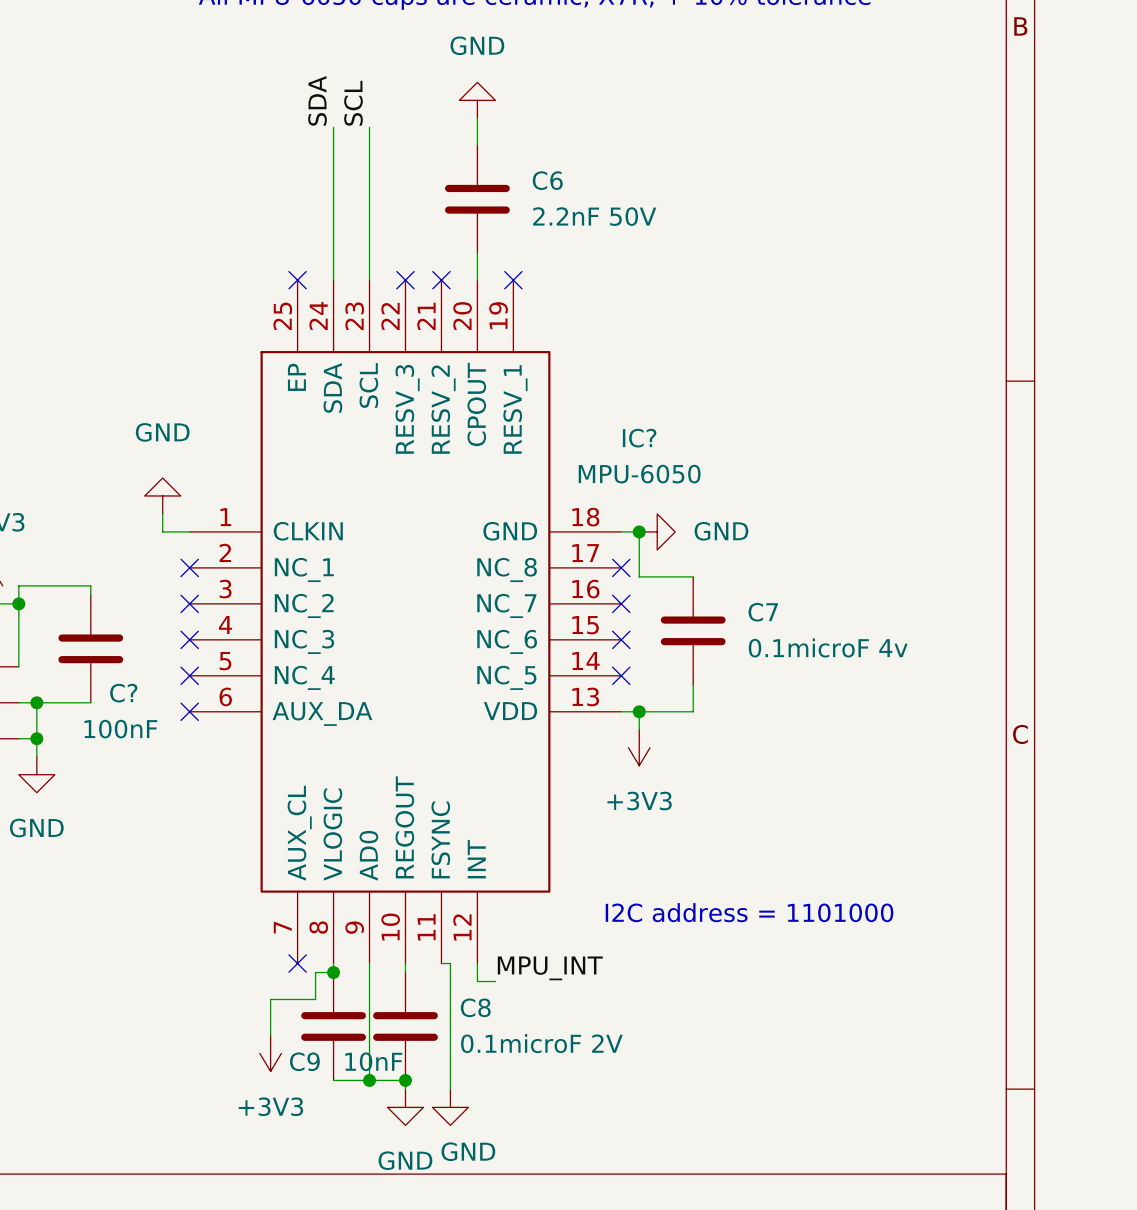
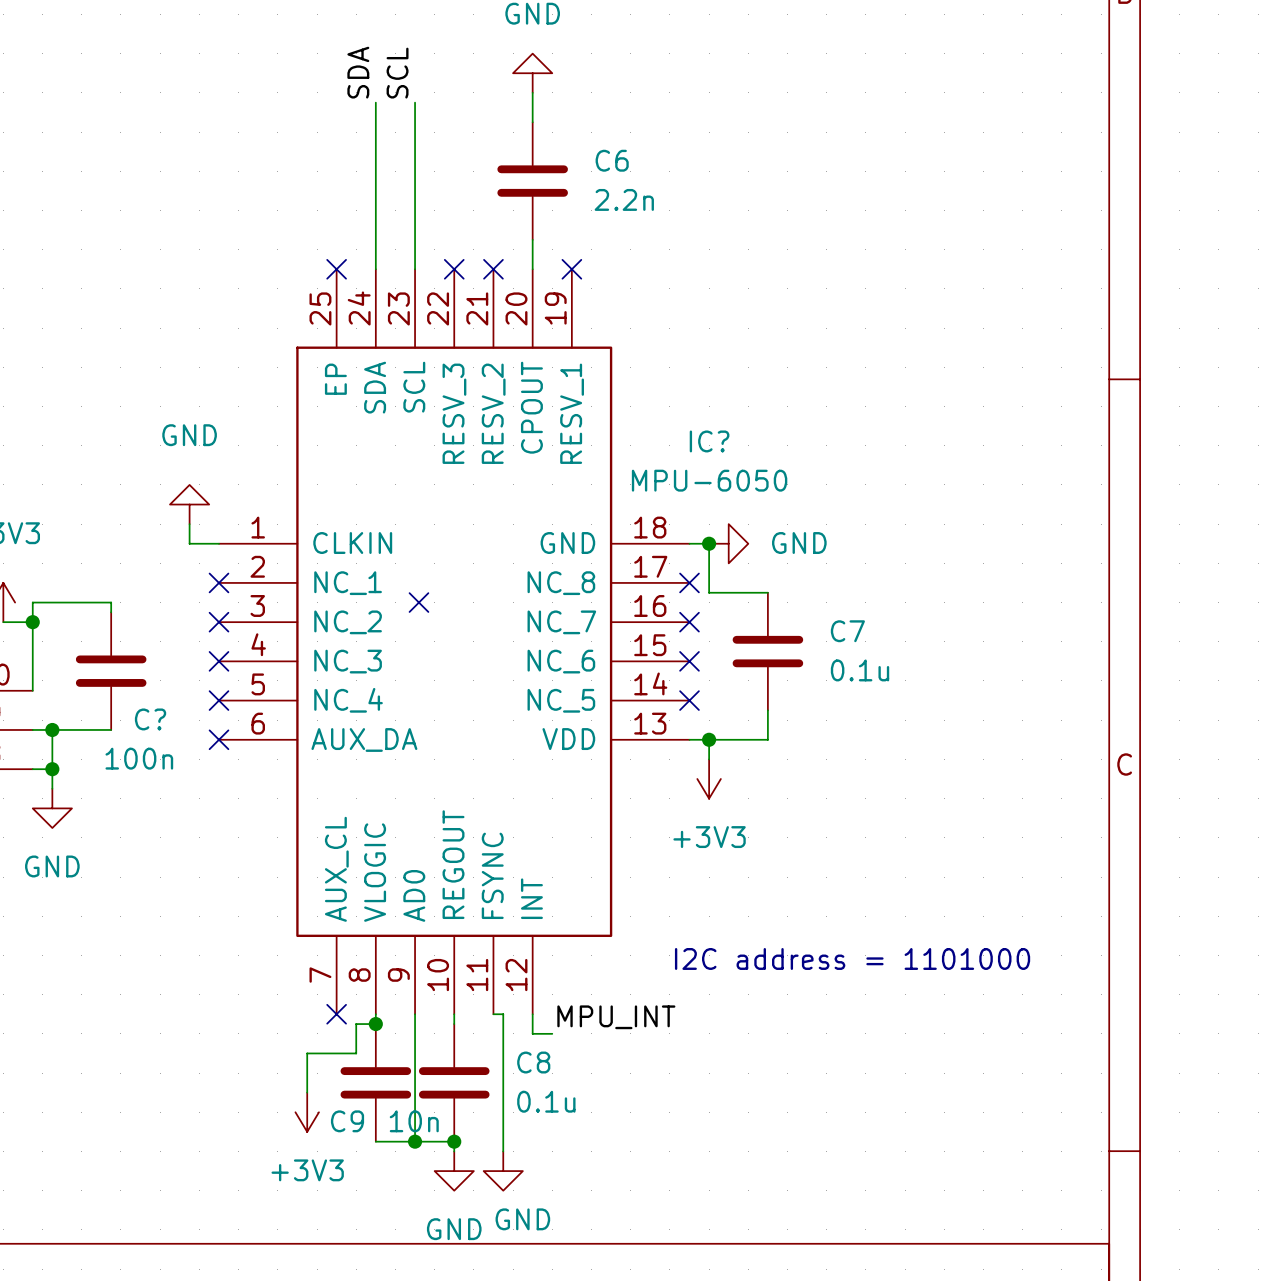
C6 value: 2.2nF 50V (594, 216) -> 2.2n (624, 199)
no-connect mark: none -> (418, 602)
C7 value: 0.1microF 4v (828, 647) -> 0.1u (860, 670)
C? value: 100nF (120, 729) -> 100n (139, 758)
C8 value: 0.1microF 2V (541, 1043) -> 0.1u (546, 1101)
C9 value: 10nF (373, 1061) -> 10n (414, 1121)

